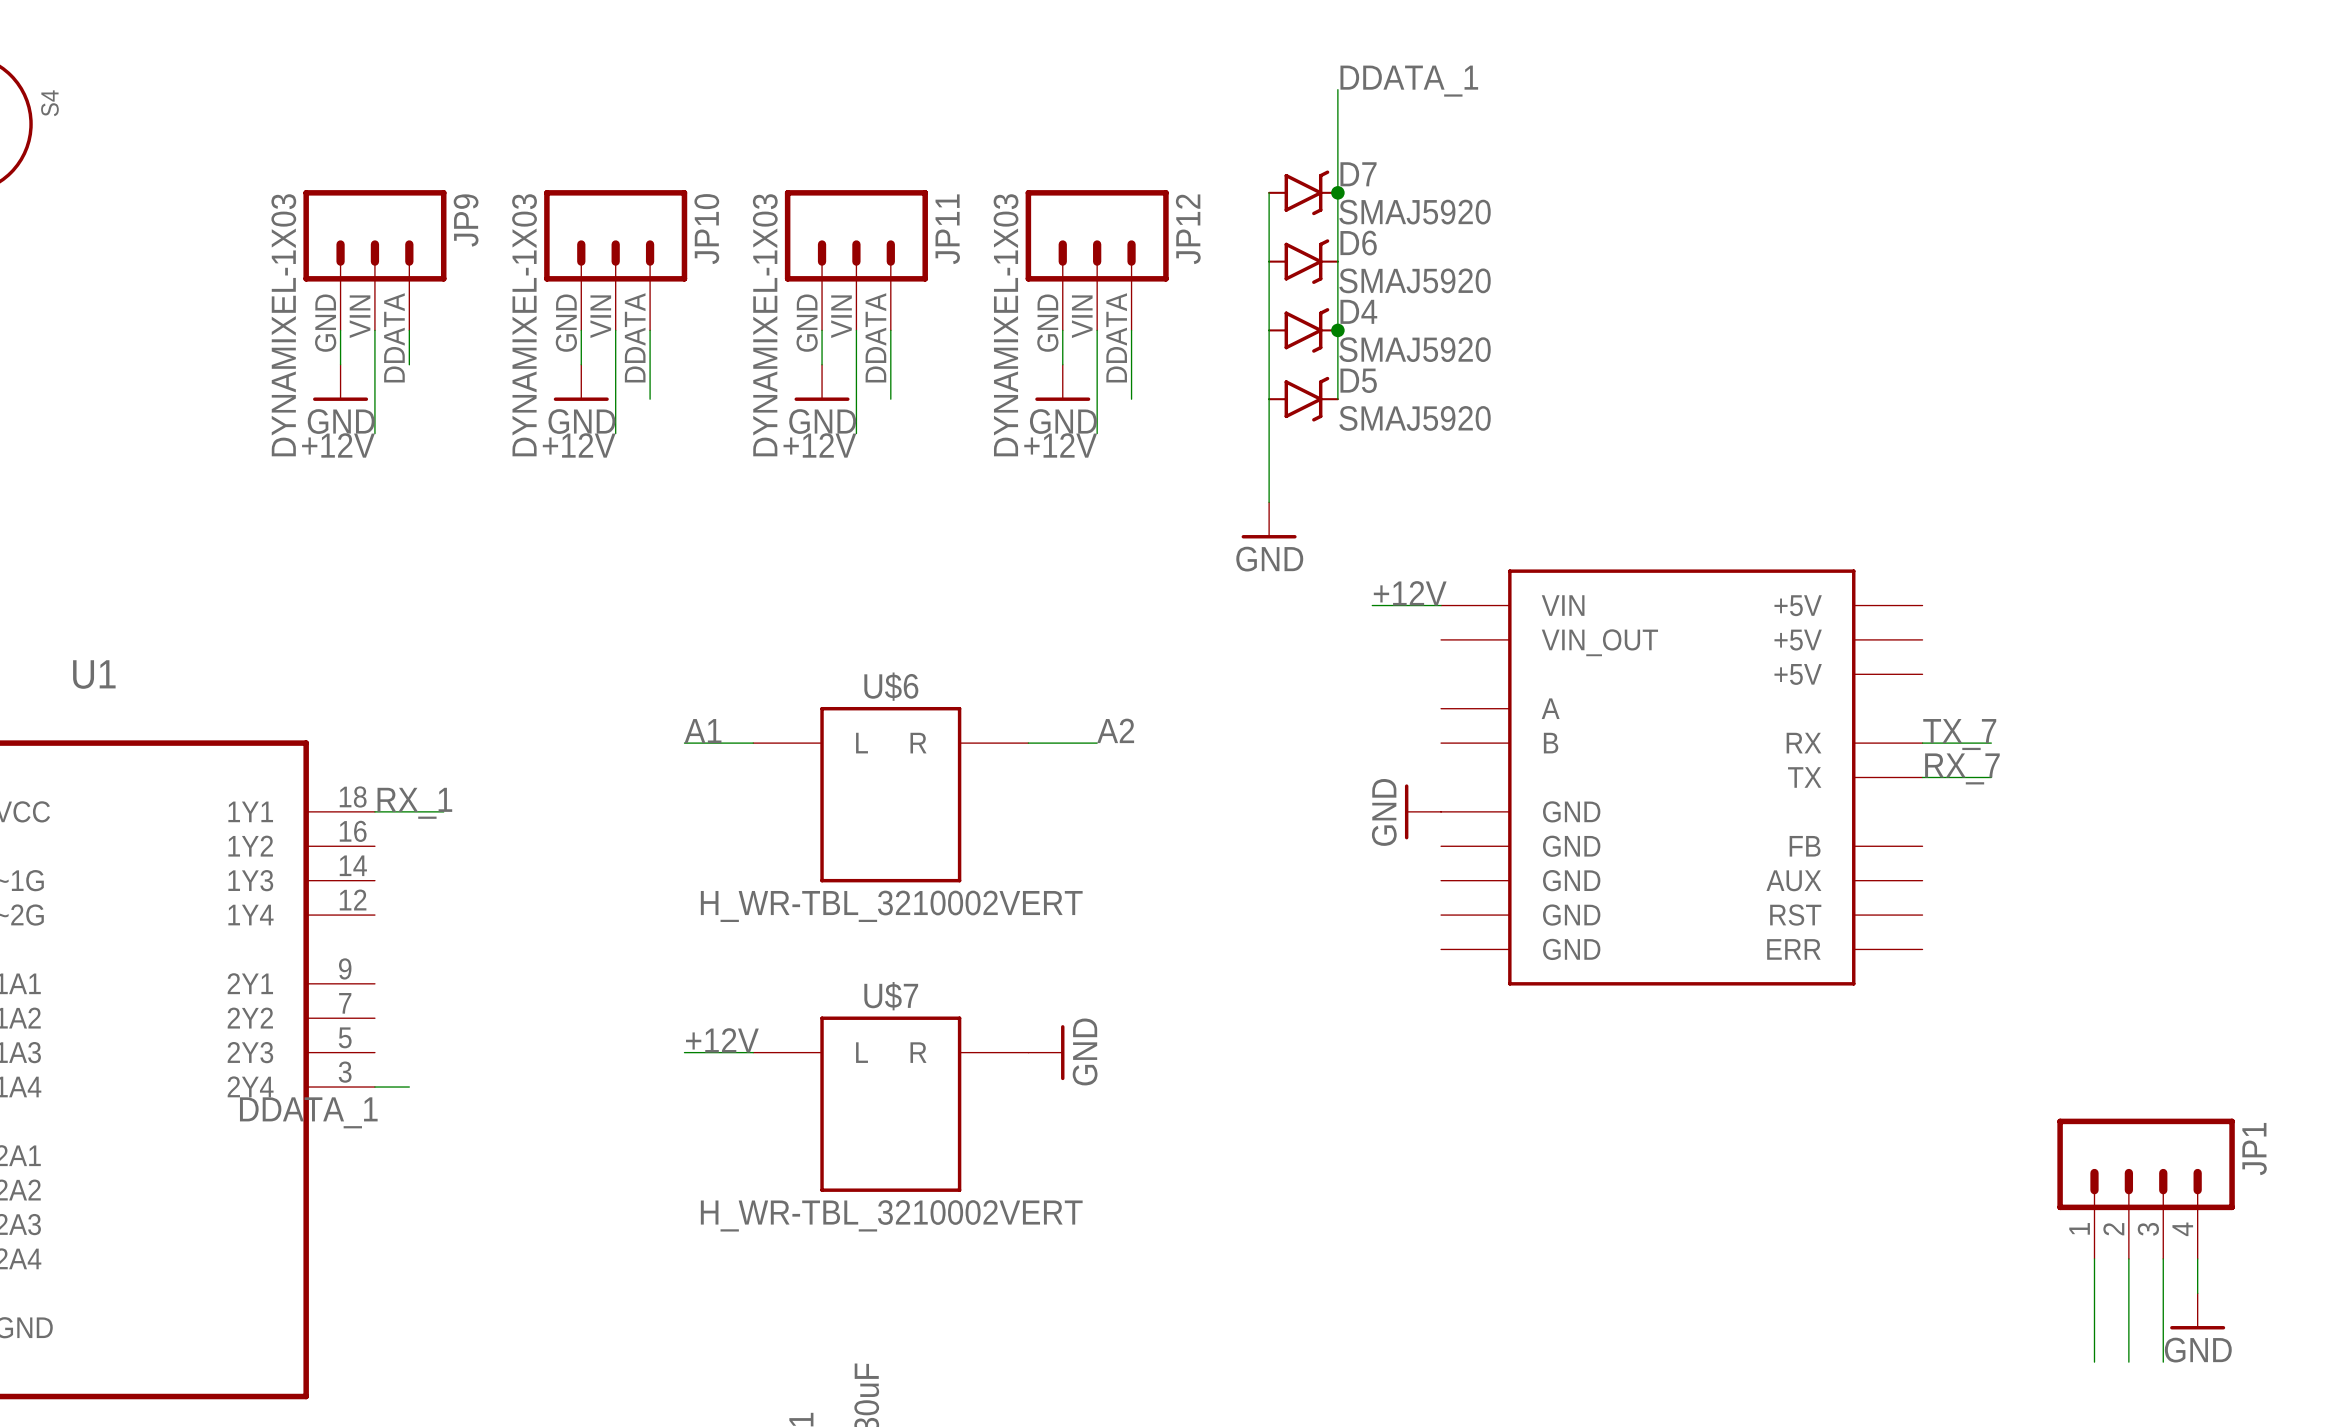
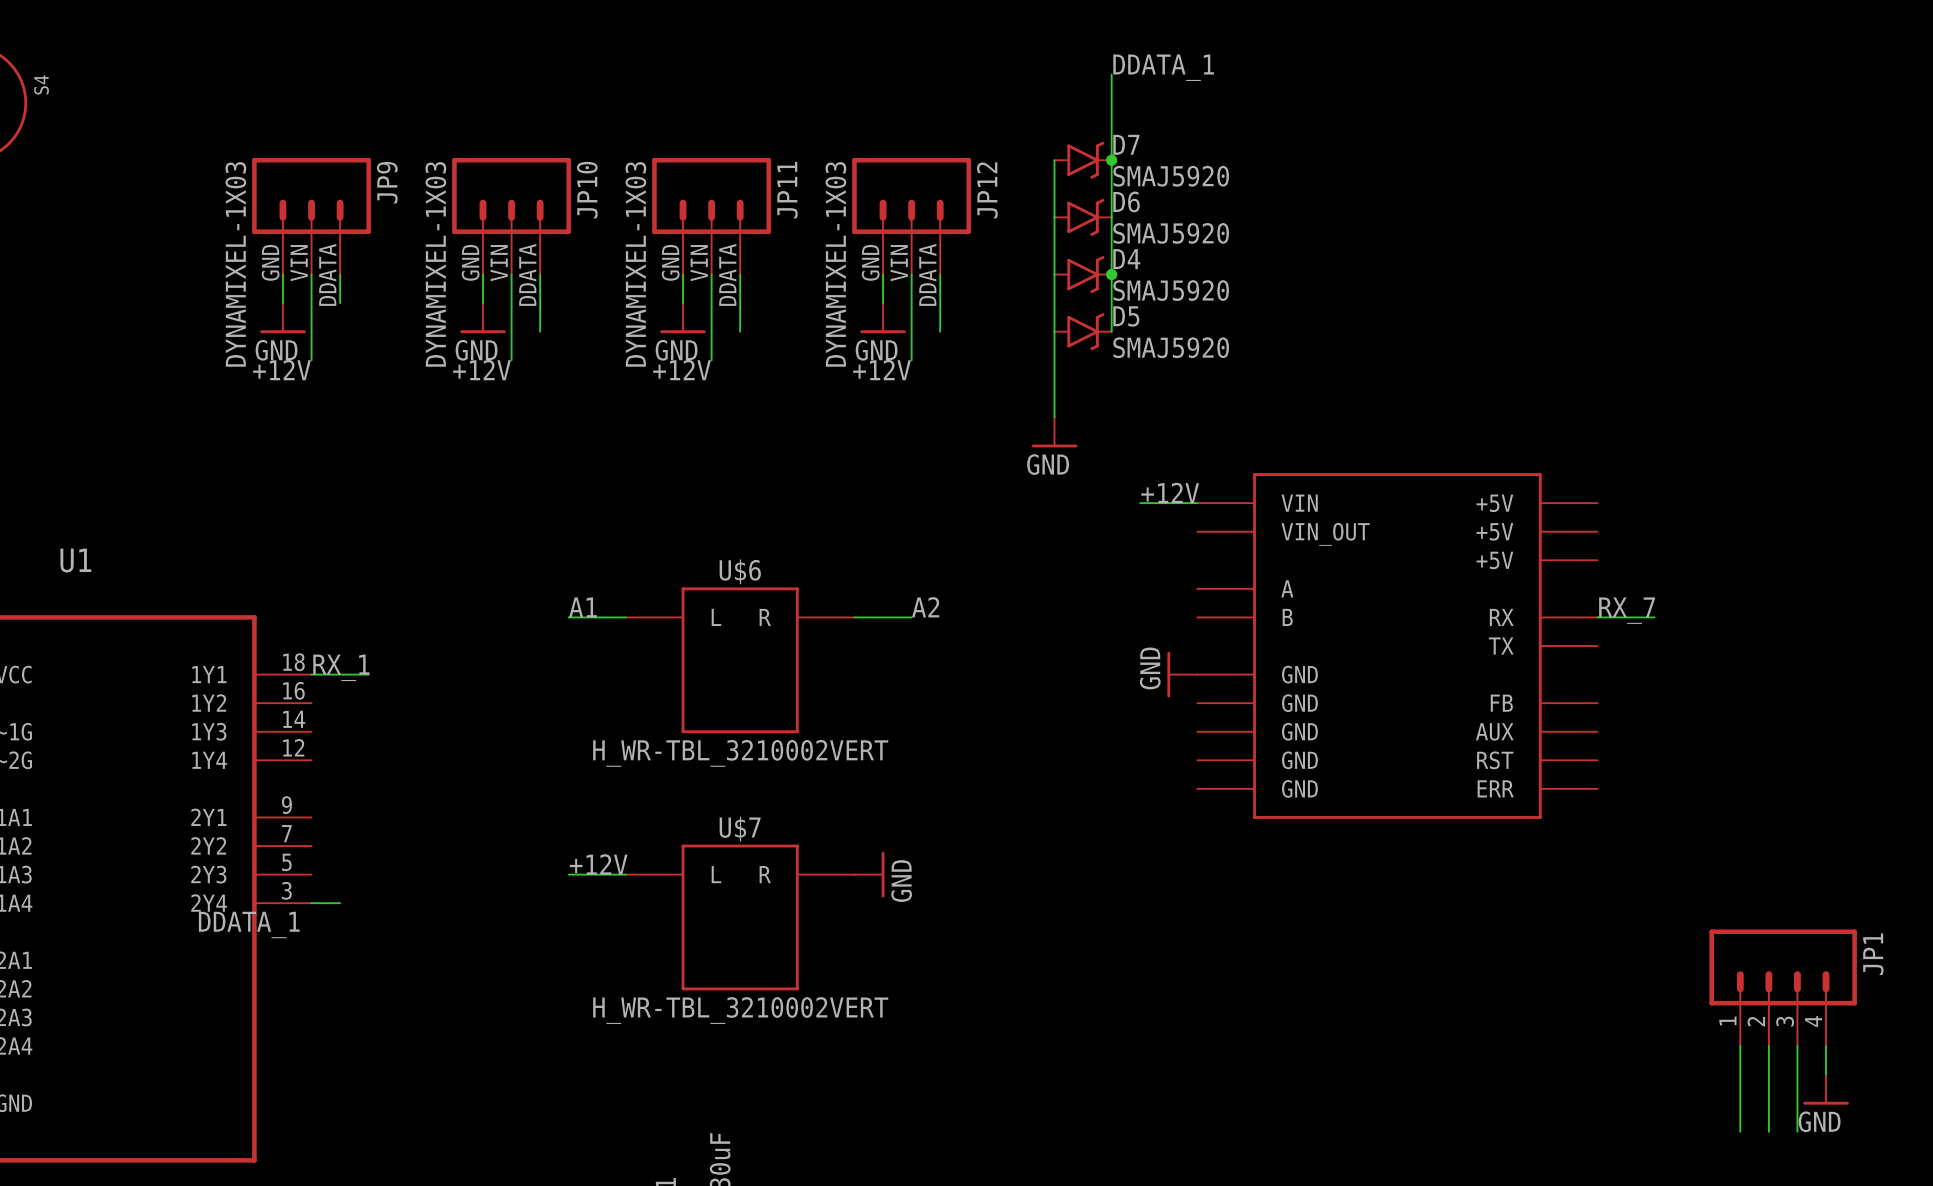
label: TX_7 (1959, 734) -> RX_7 (1627, 610)
label: RX_7 (1962, 768) -> none
wire: (1922, 777) (1991, 777) -> none

